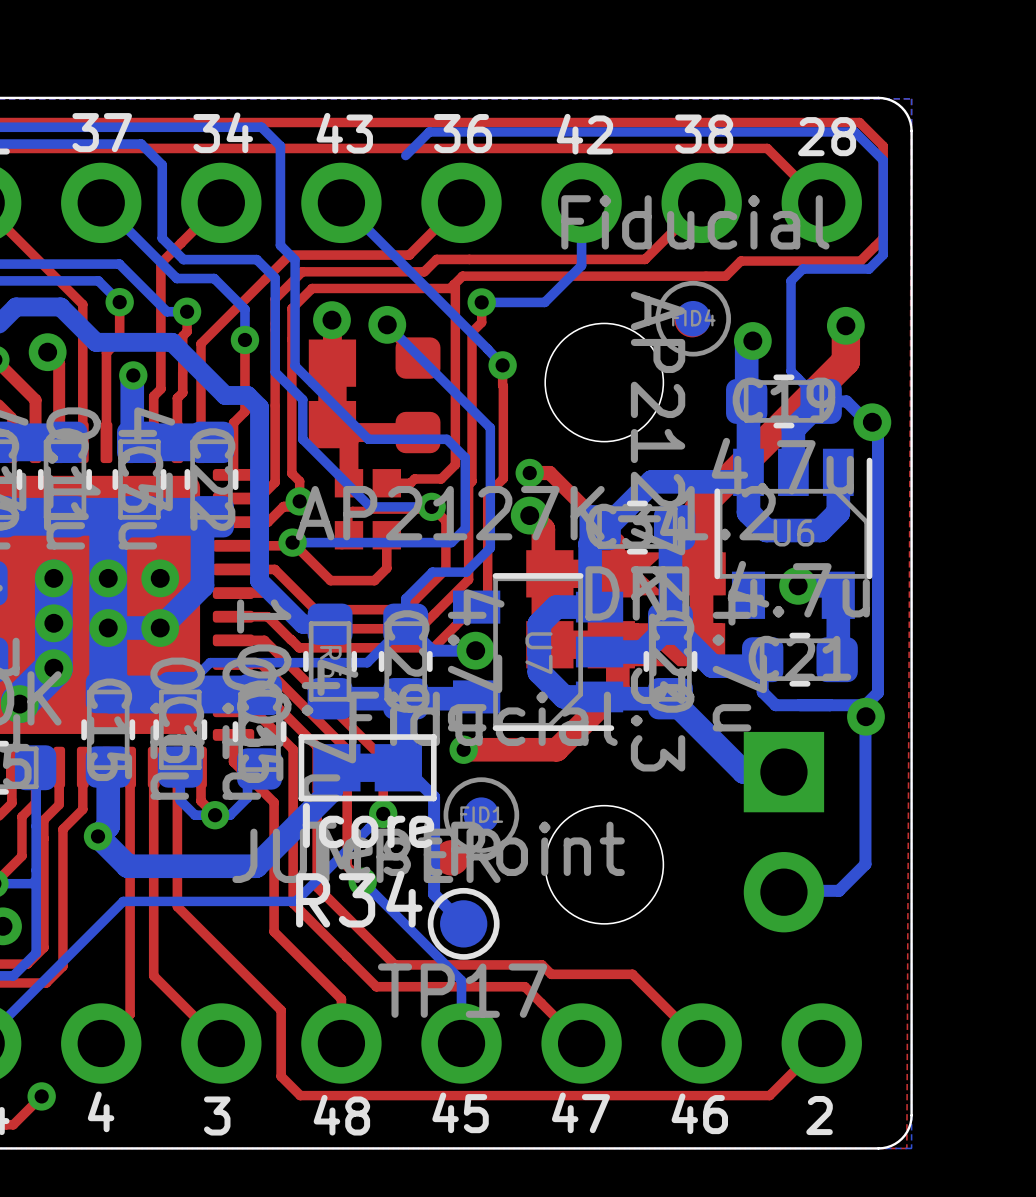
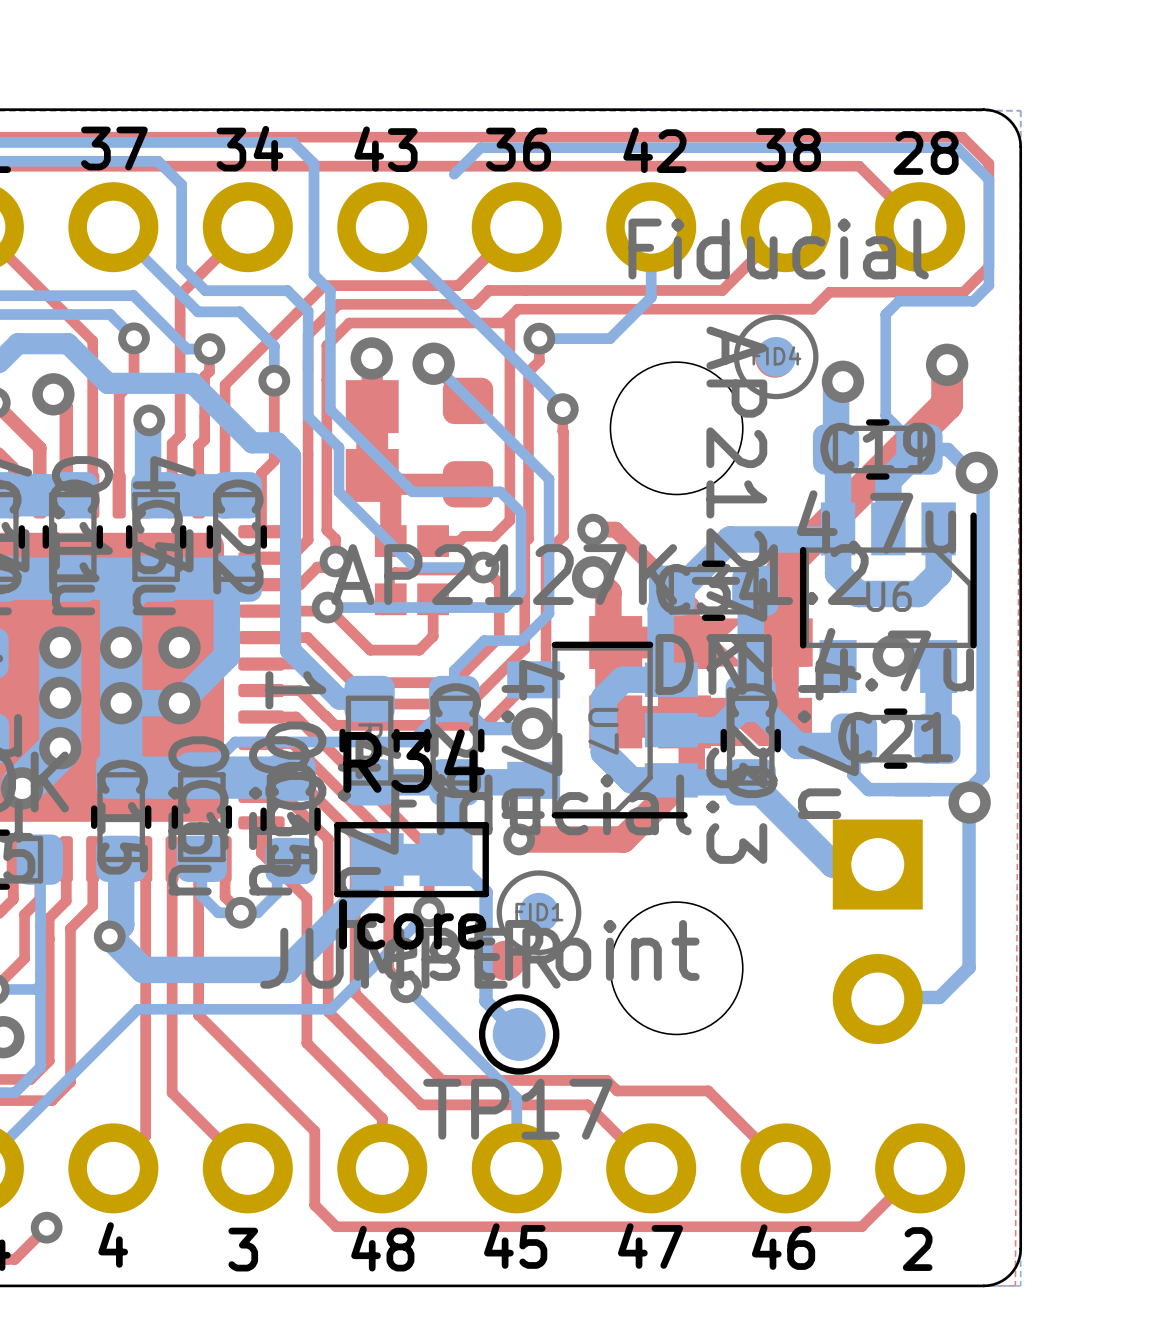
R34 name position: R34 (359, 899) -> R34 (414, 761)

